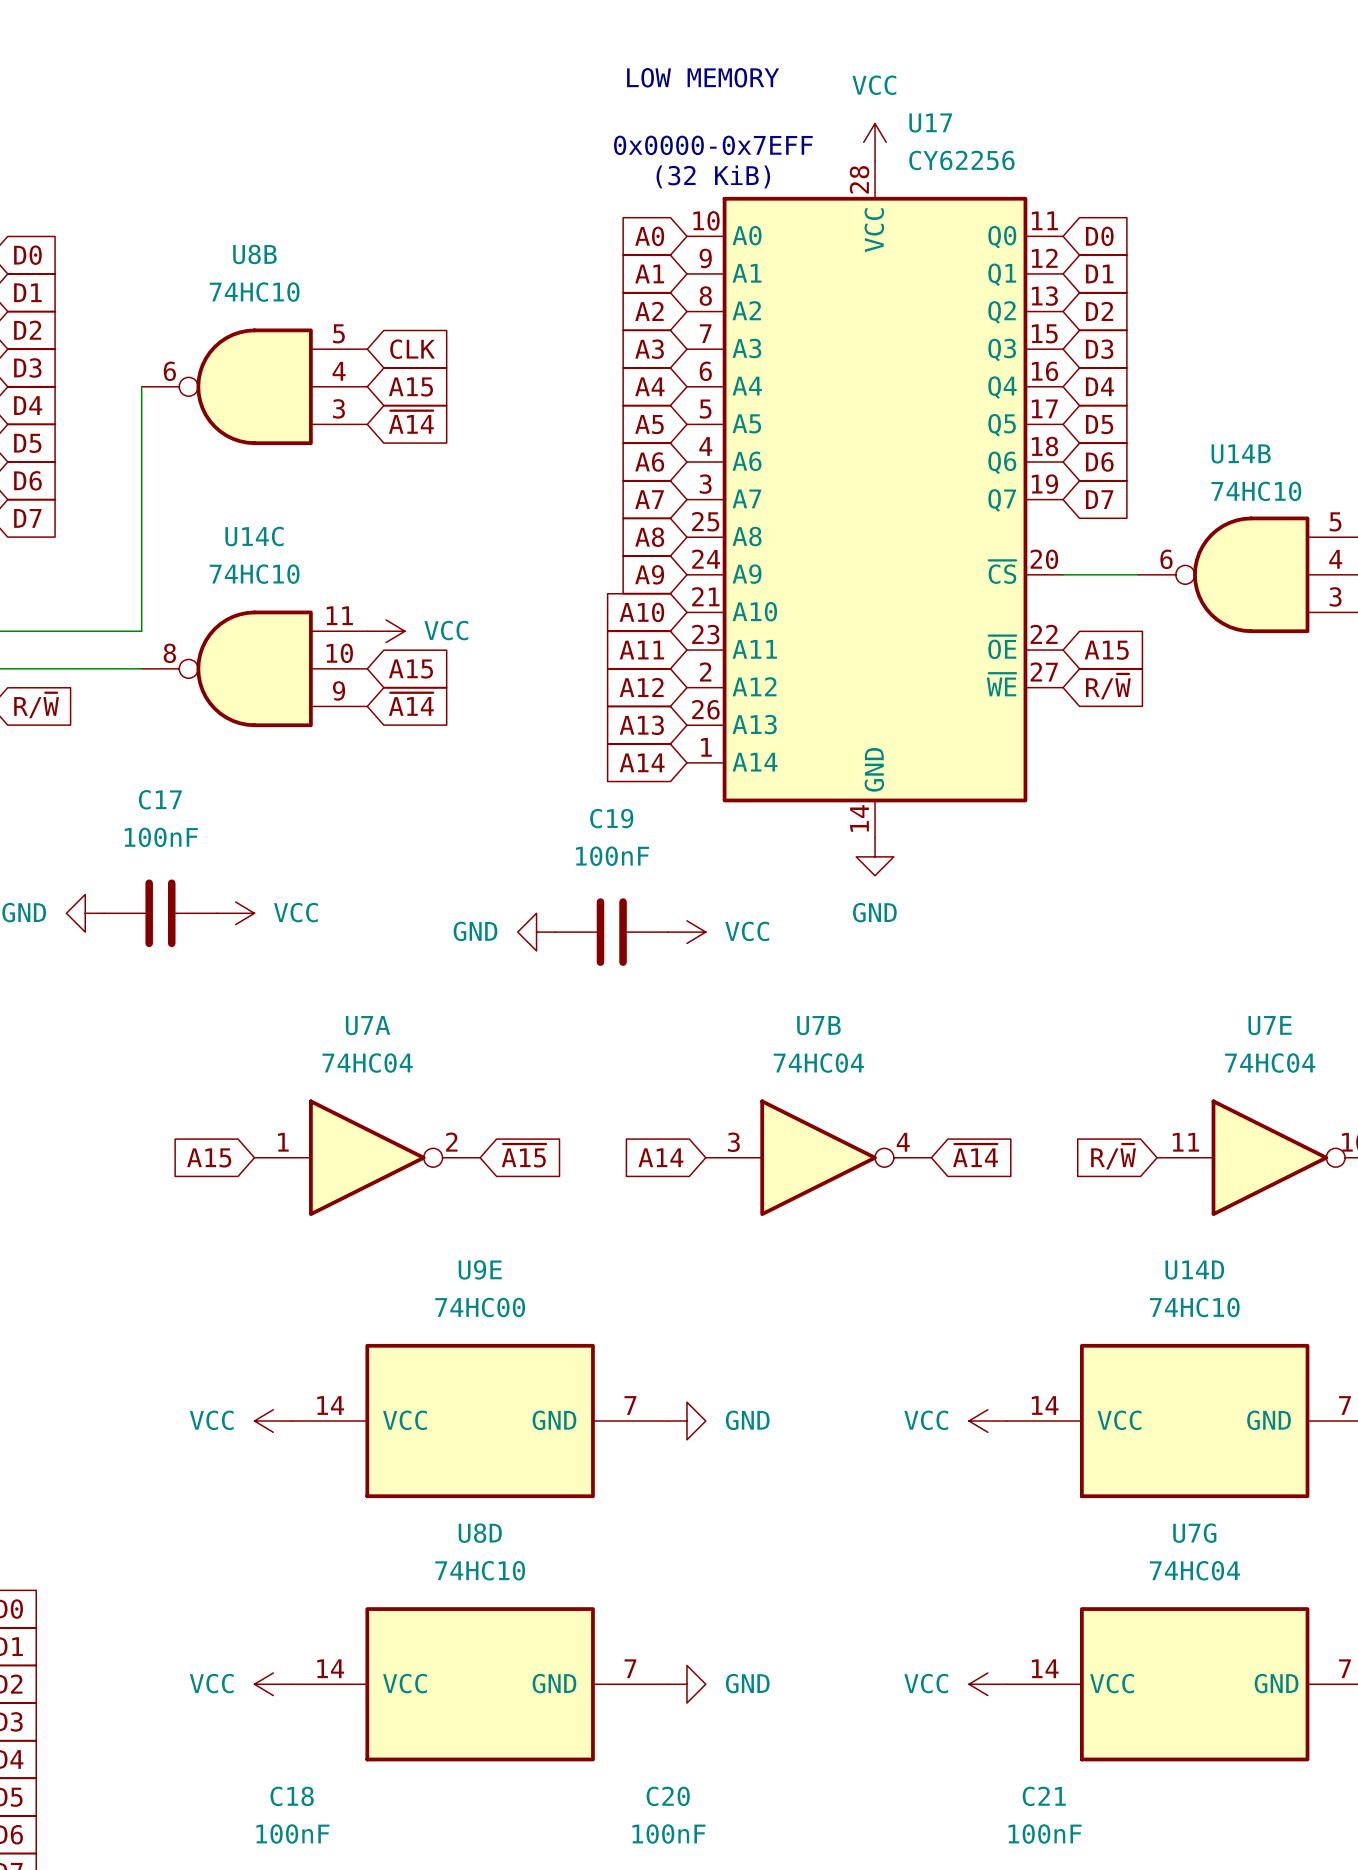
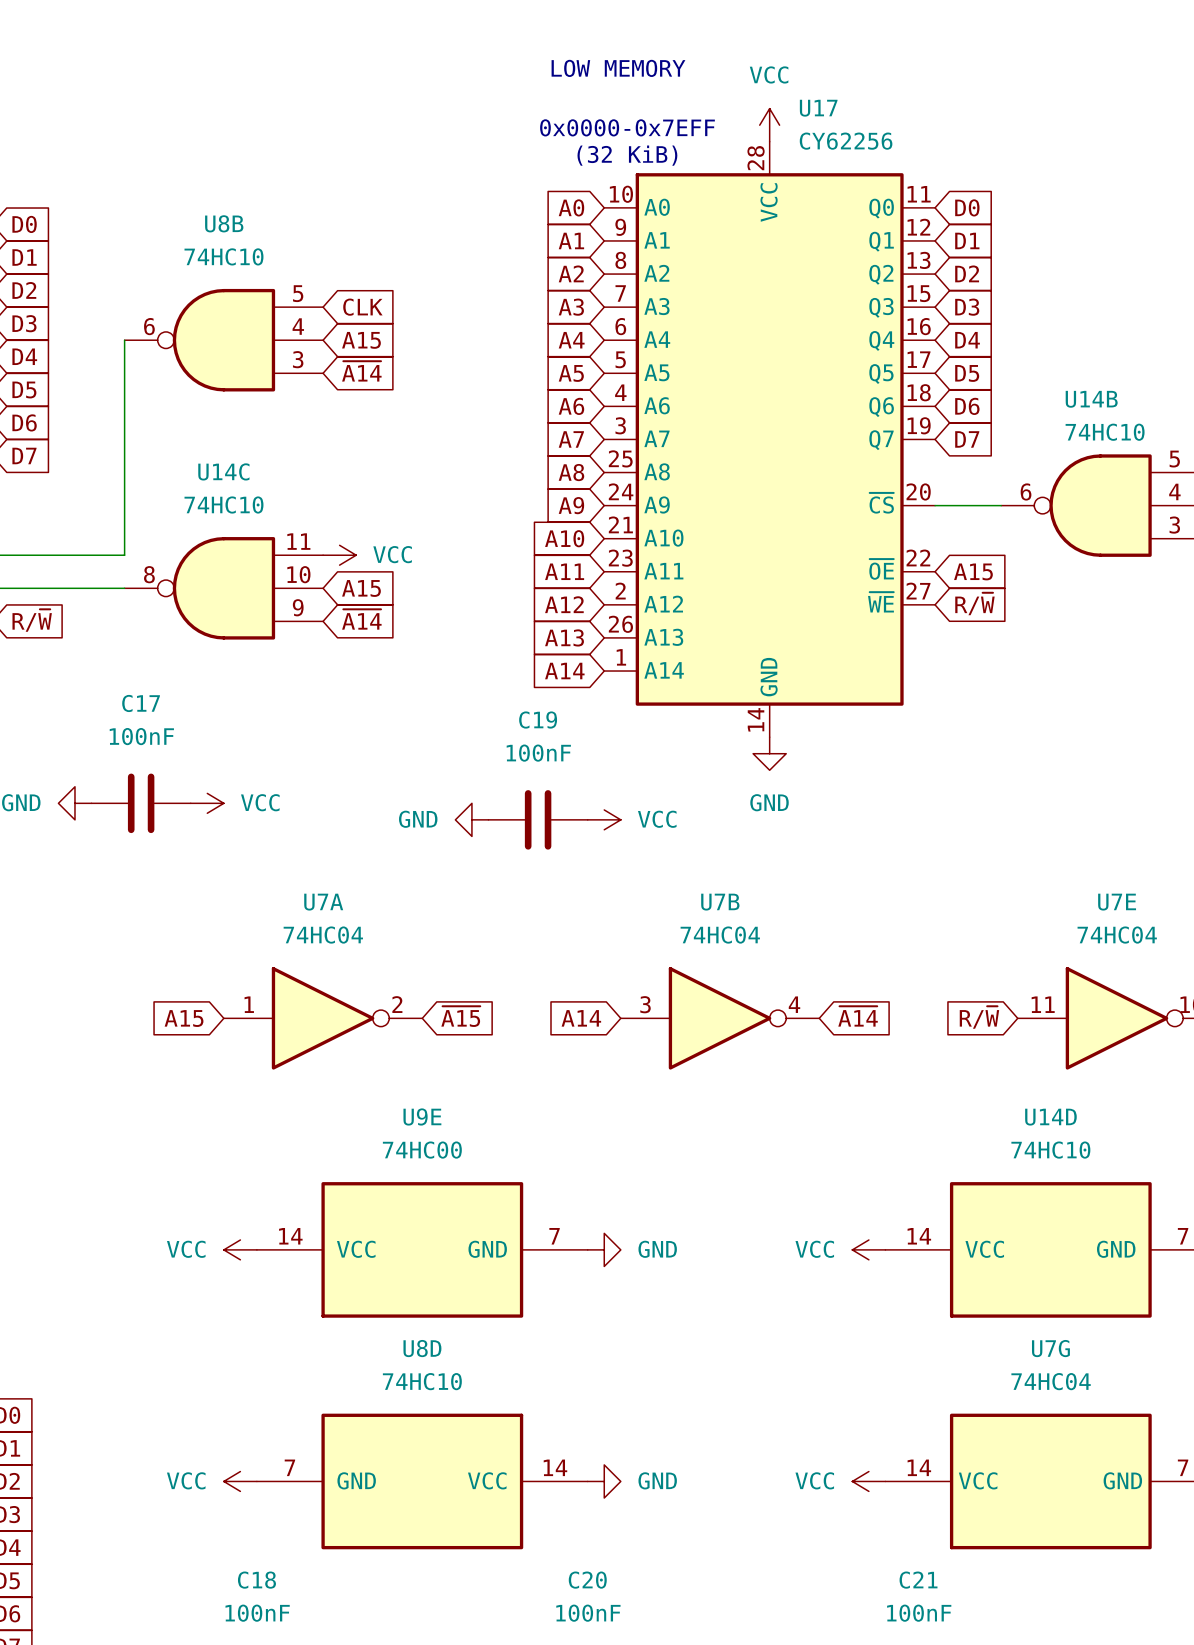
U8D rotation: 0° (480, 1684) -> 180° (422, 1481)

